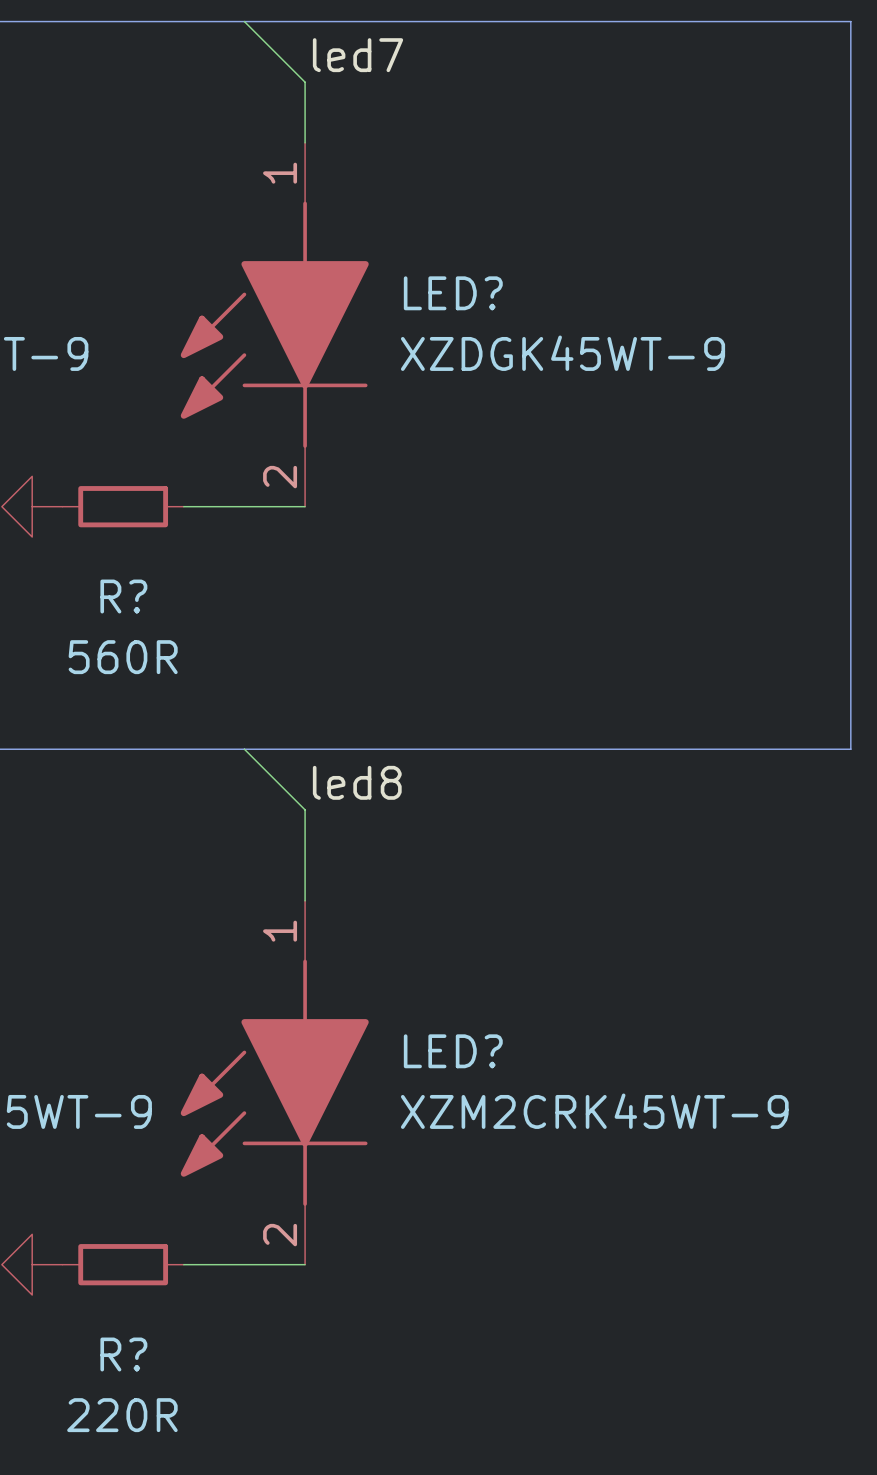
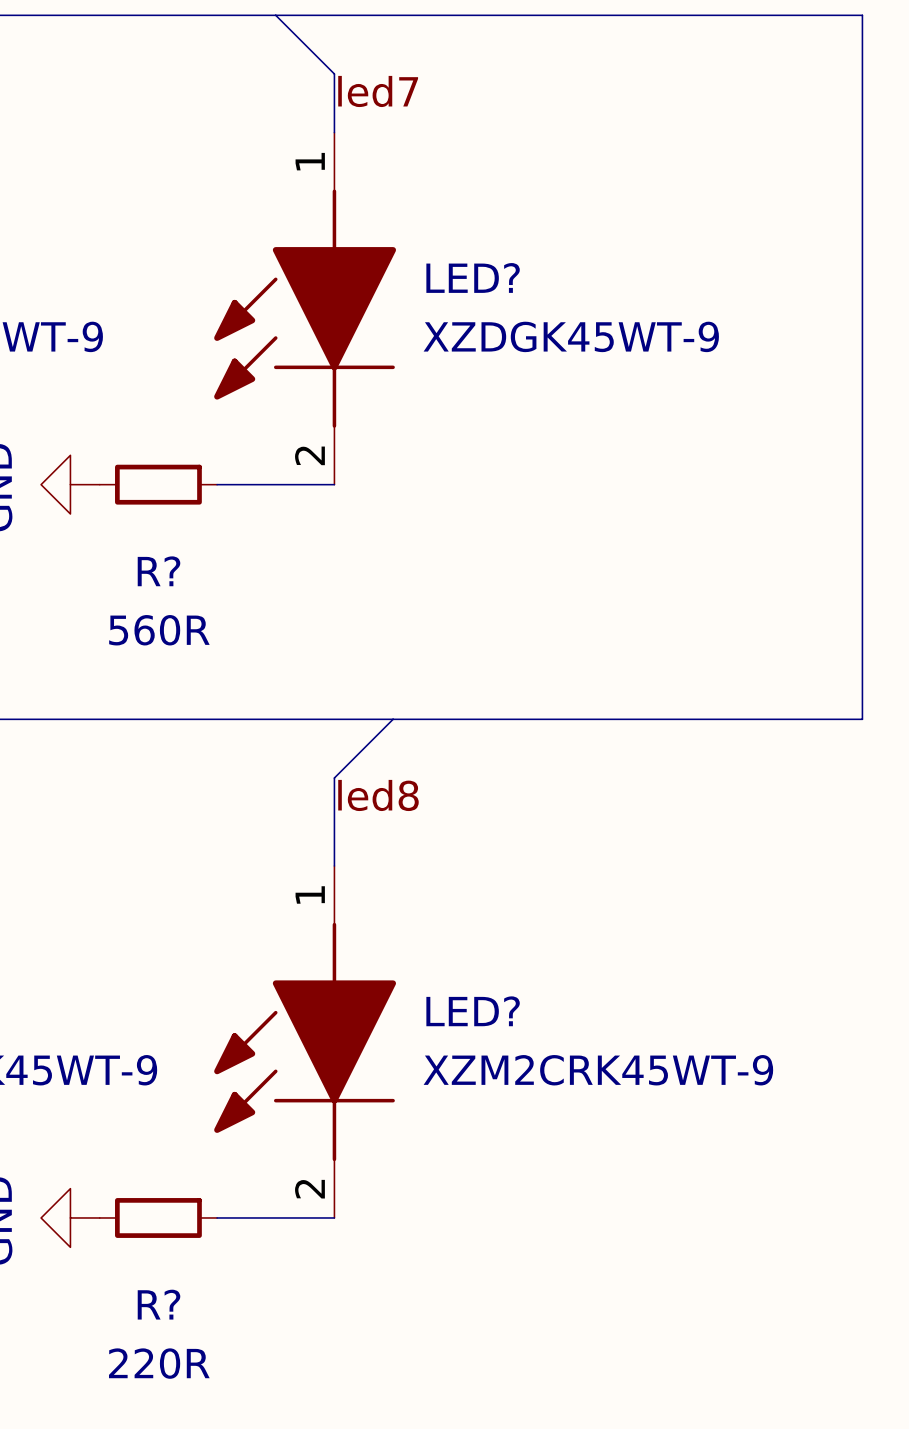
label position: led7 (358, 55) -> led7 (378, 91)
wire: (244, 749) (305, 809) -> (393, 719) (334, 777)
label position: led8 (357, 782) -> led8 (378, 795)

